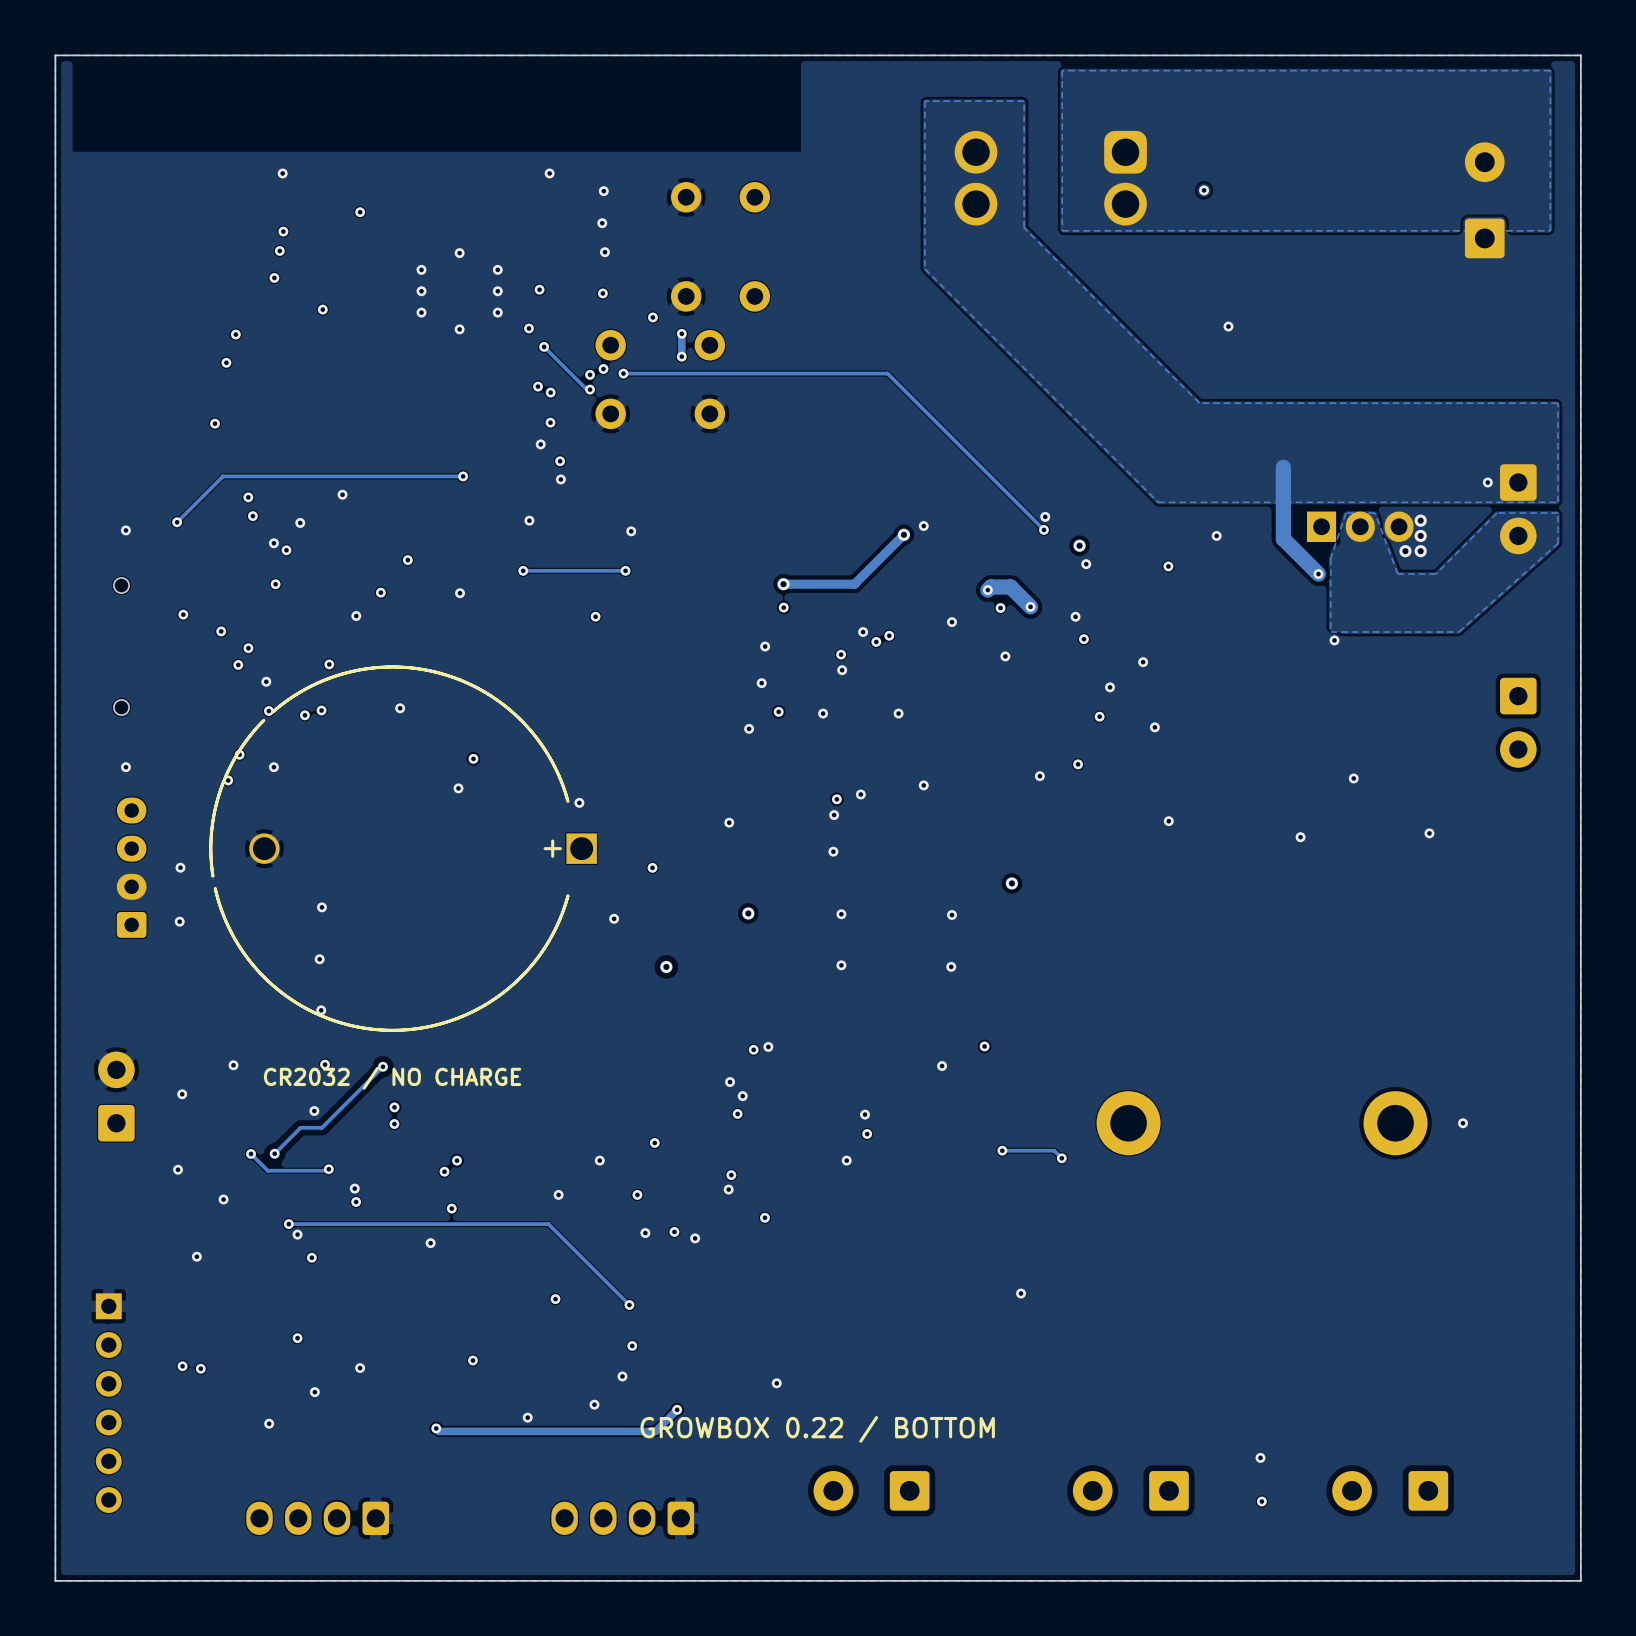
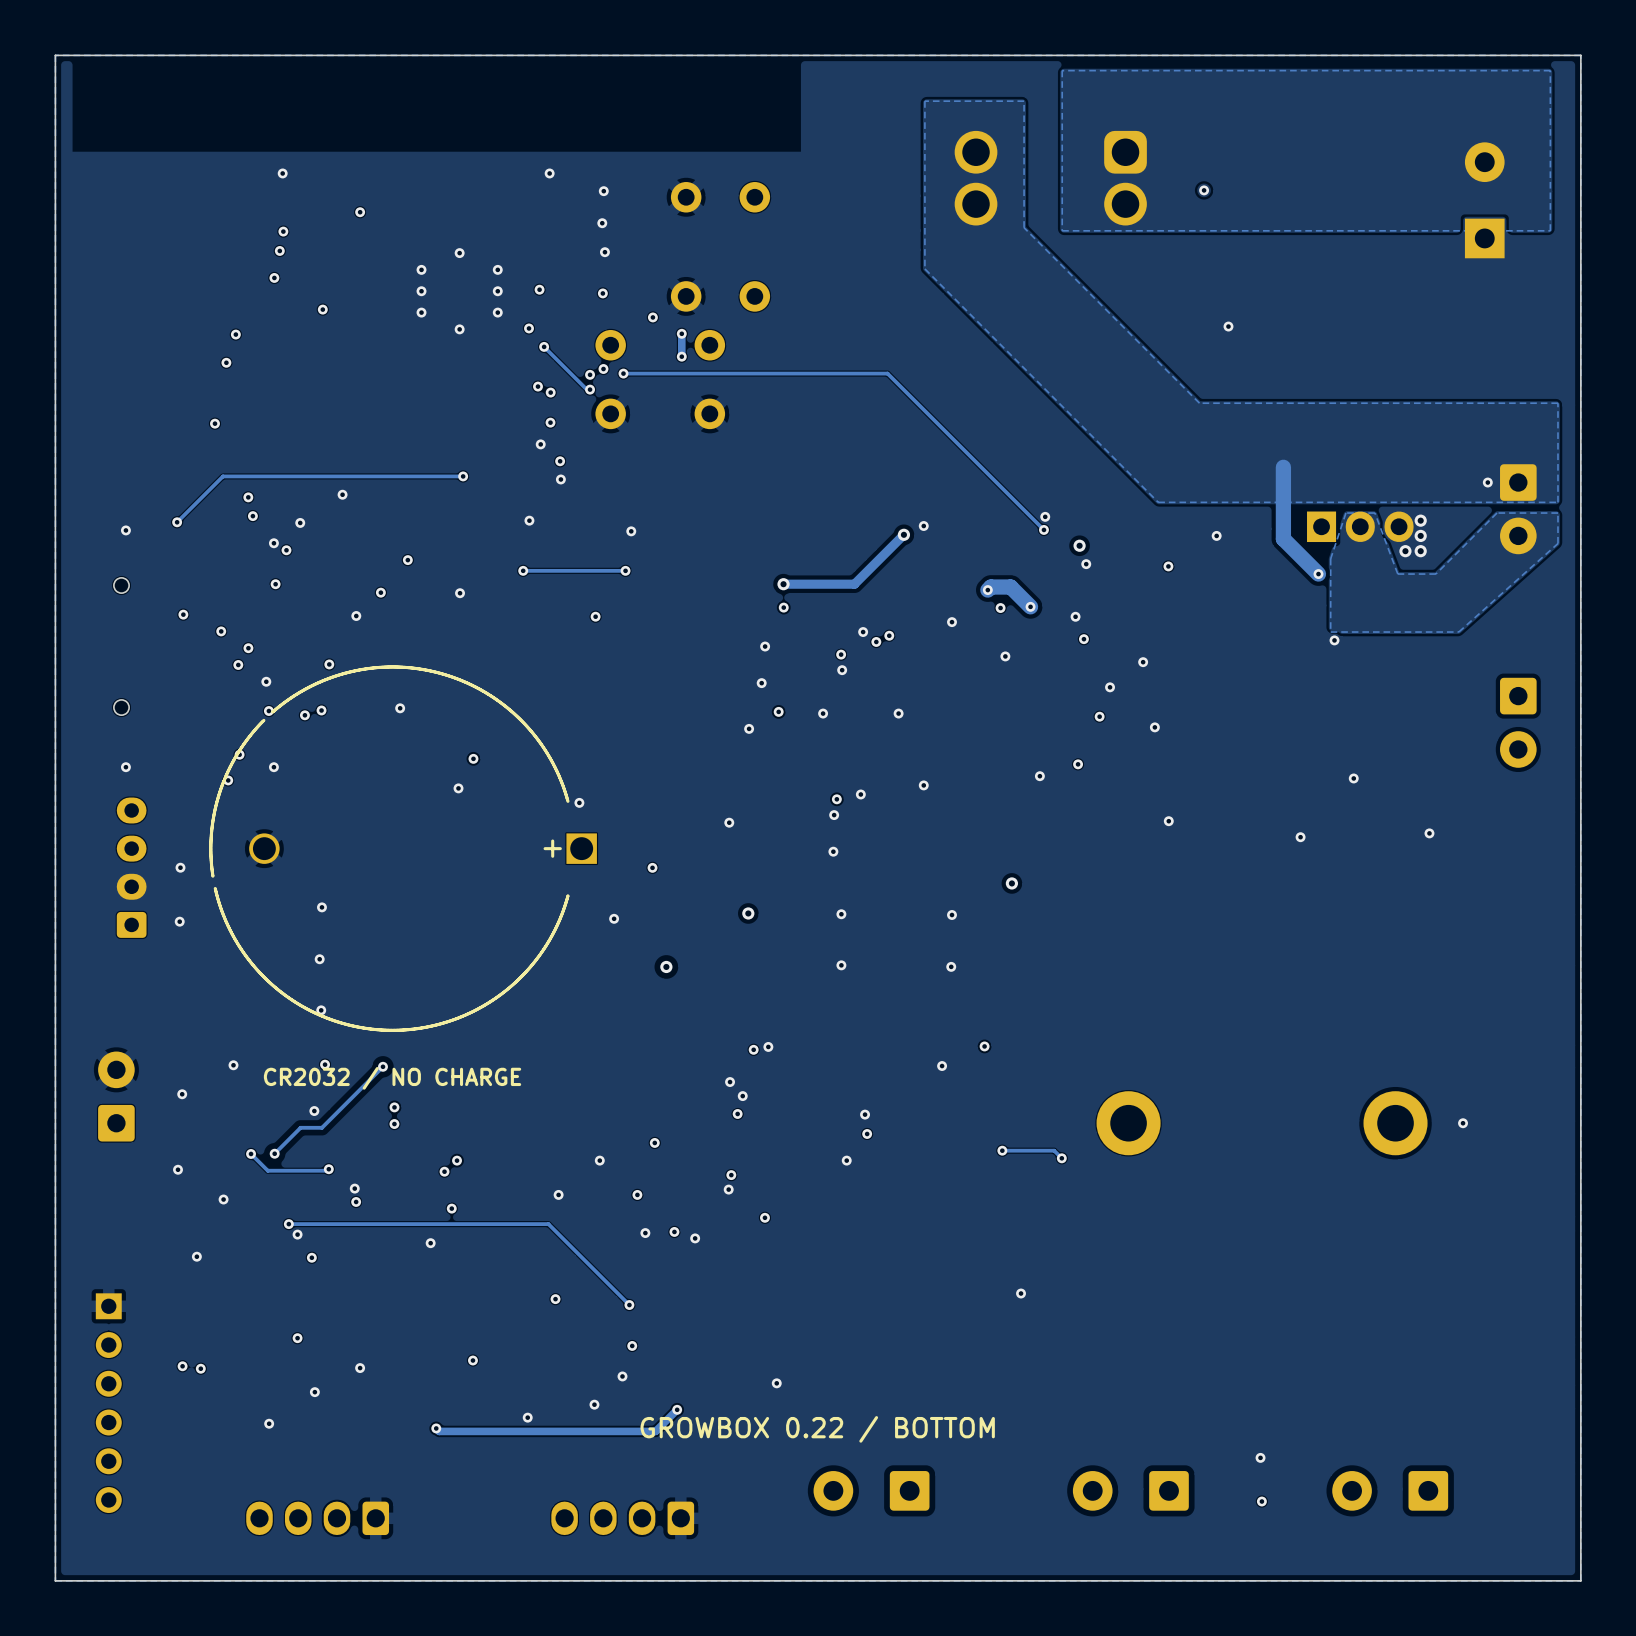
part footprint: [1464, 142, 1505, 259] -> [1464, 142, 1505, 259]

